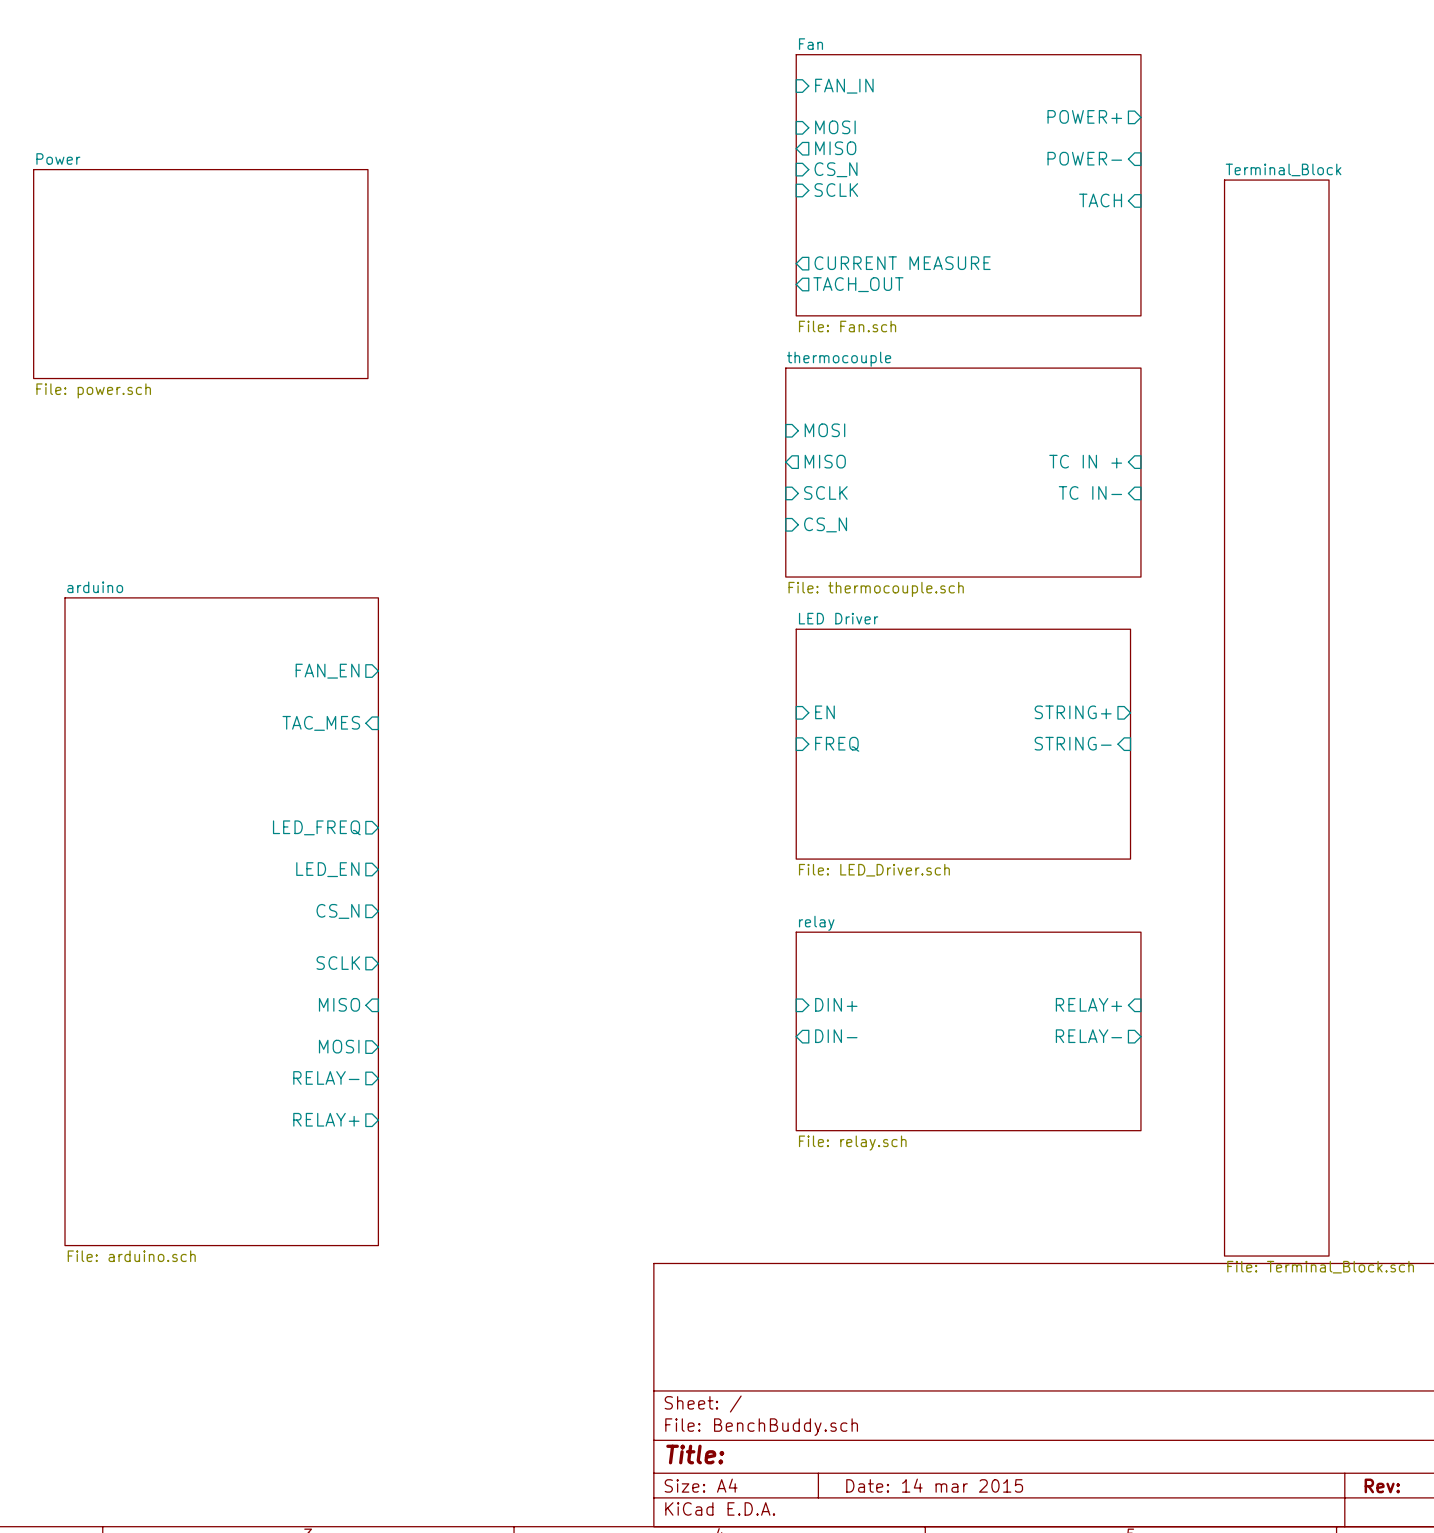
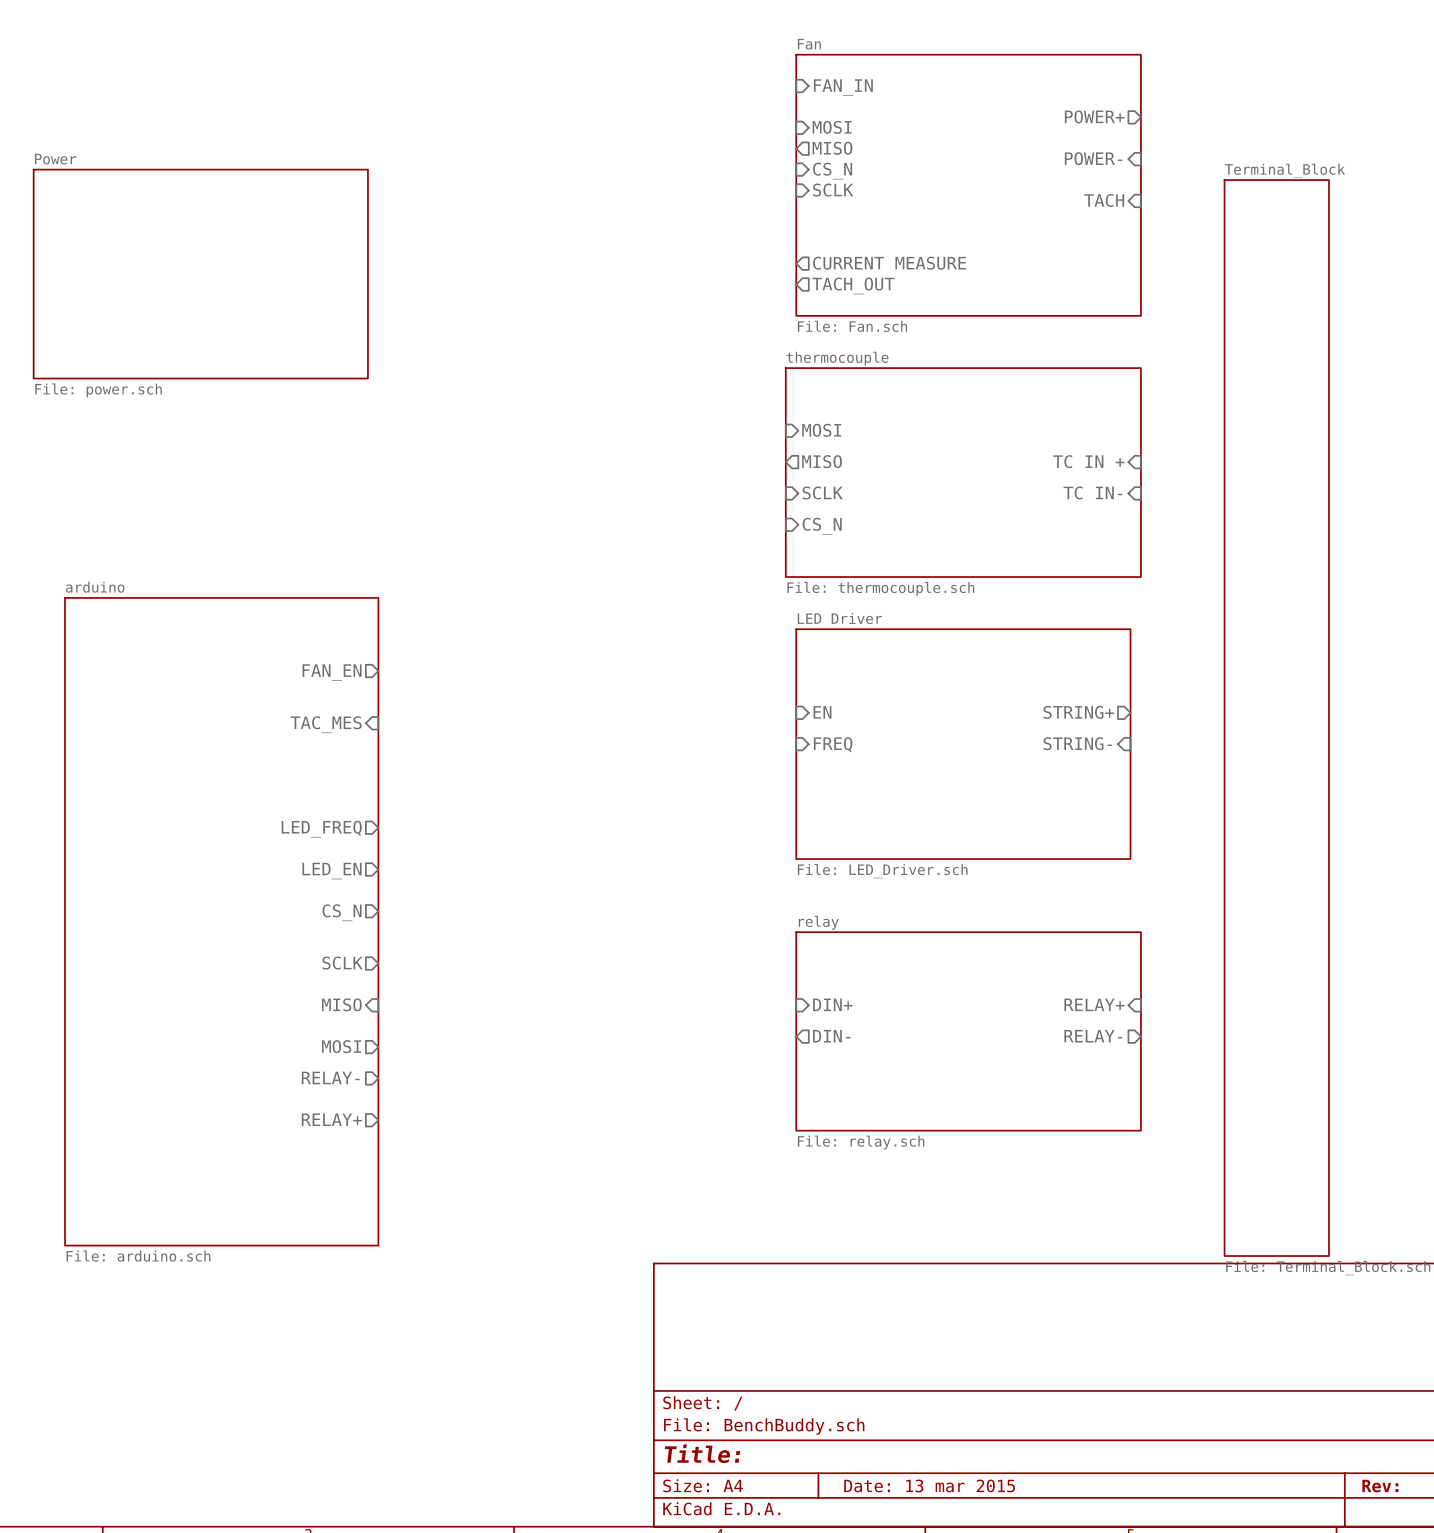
title block: Date: 14 mar 2015 (934, 1485) -> Date: 13 mar 2015 (929, 1485)

